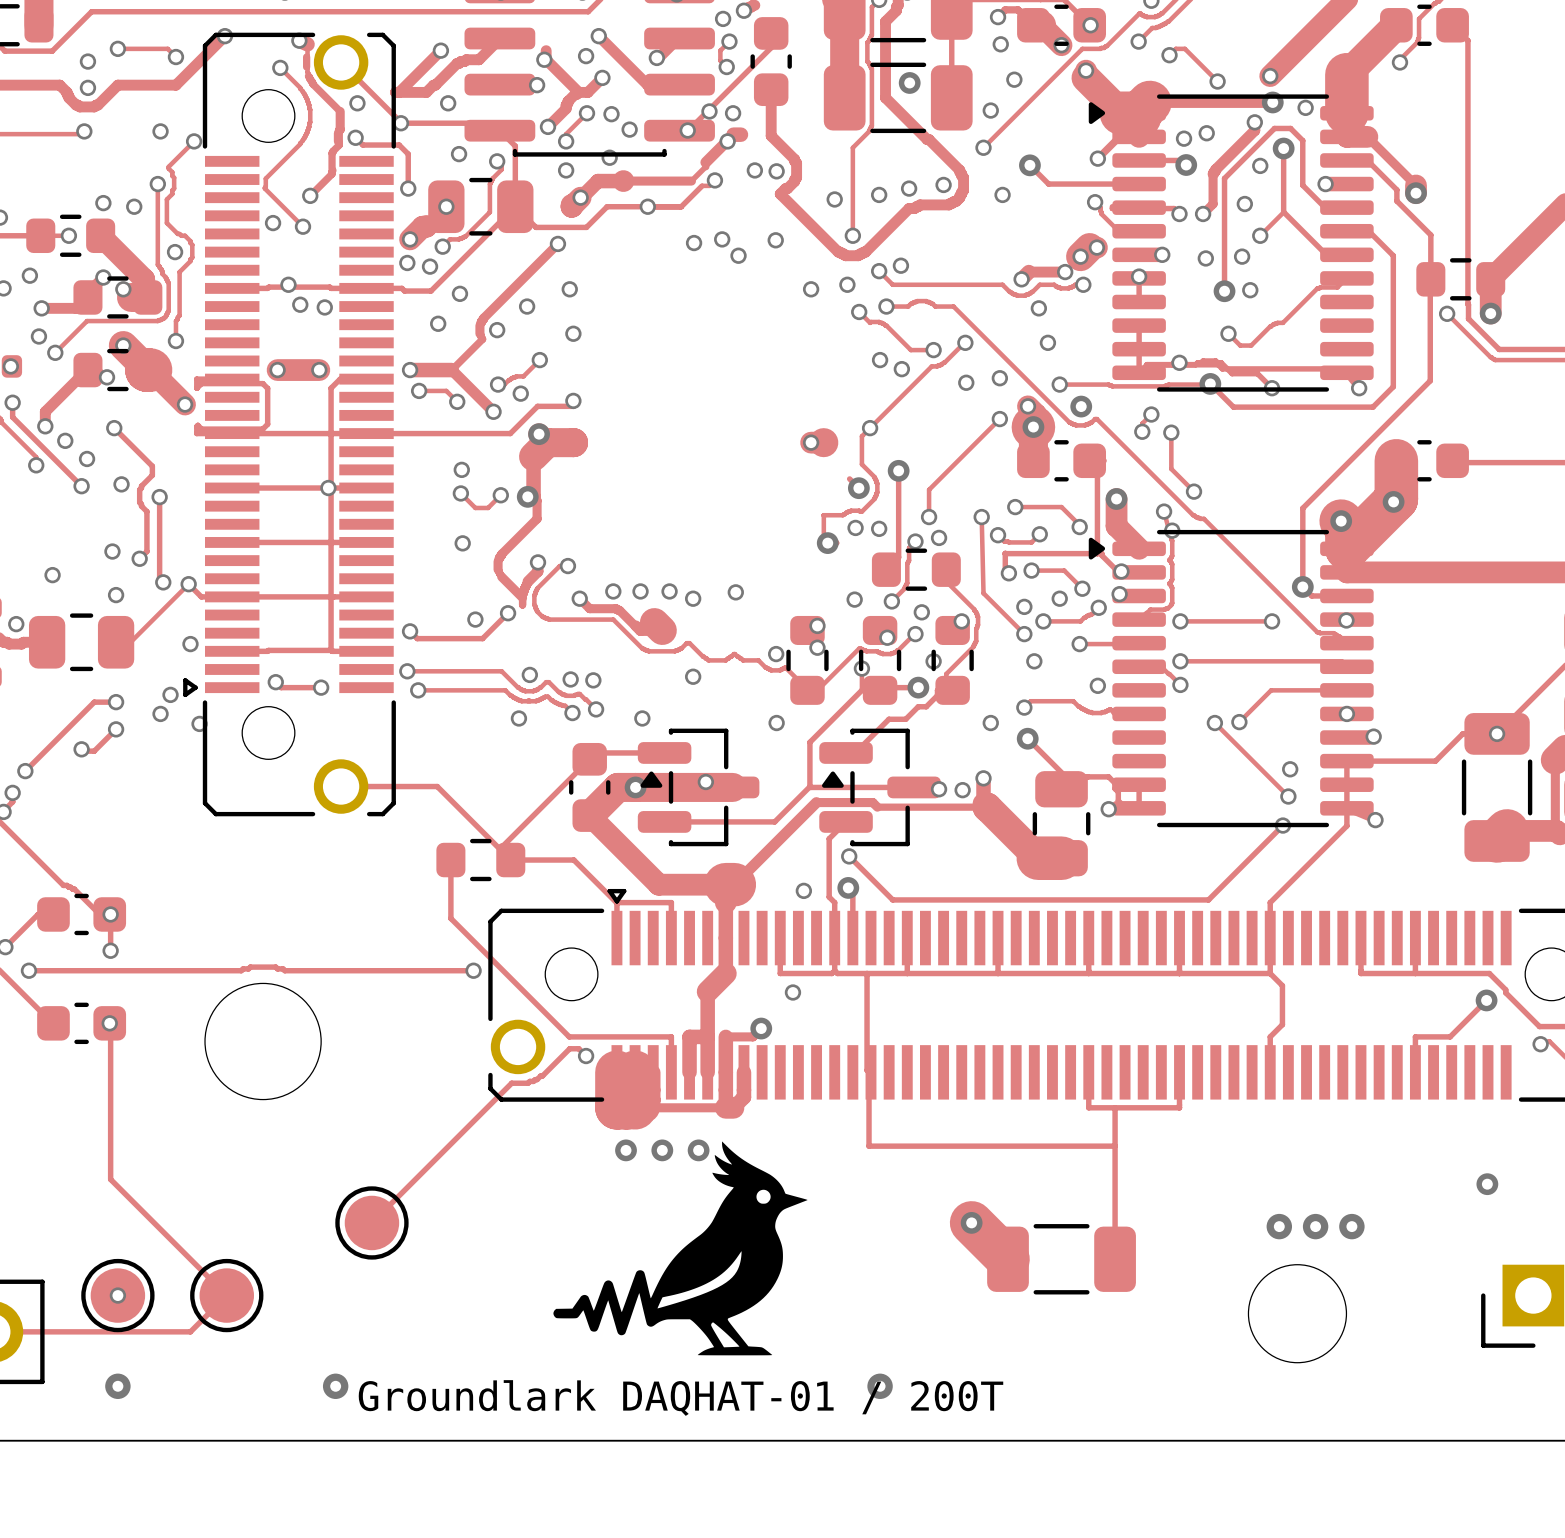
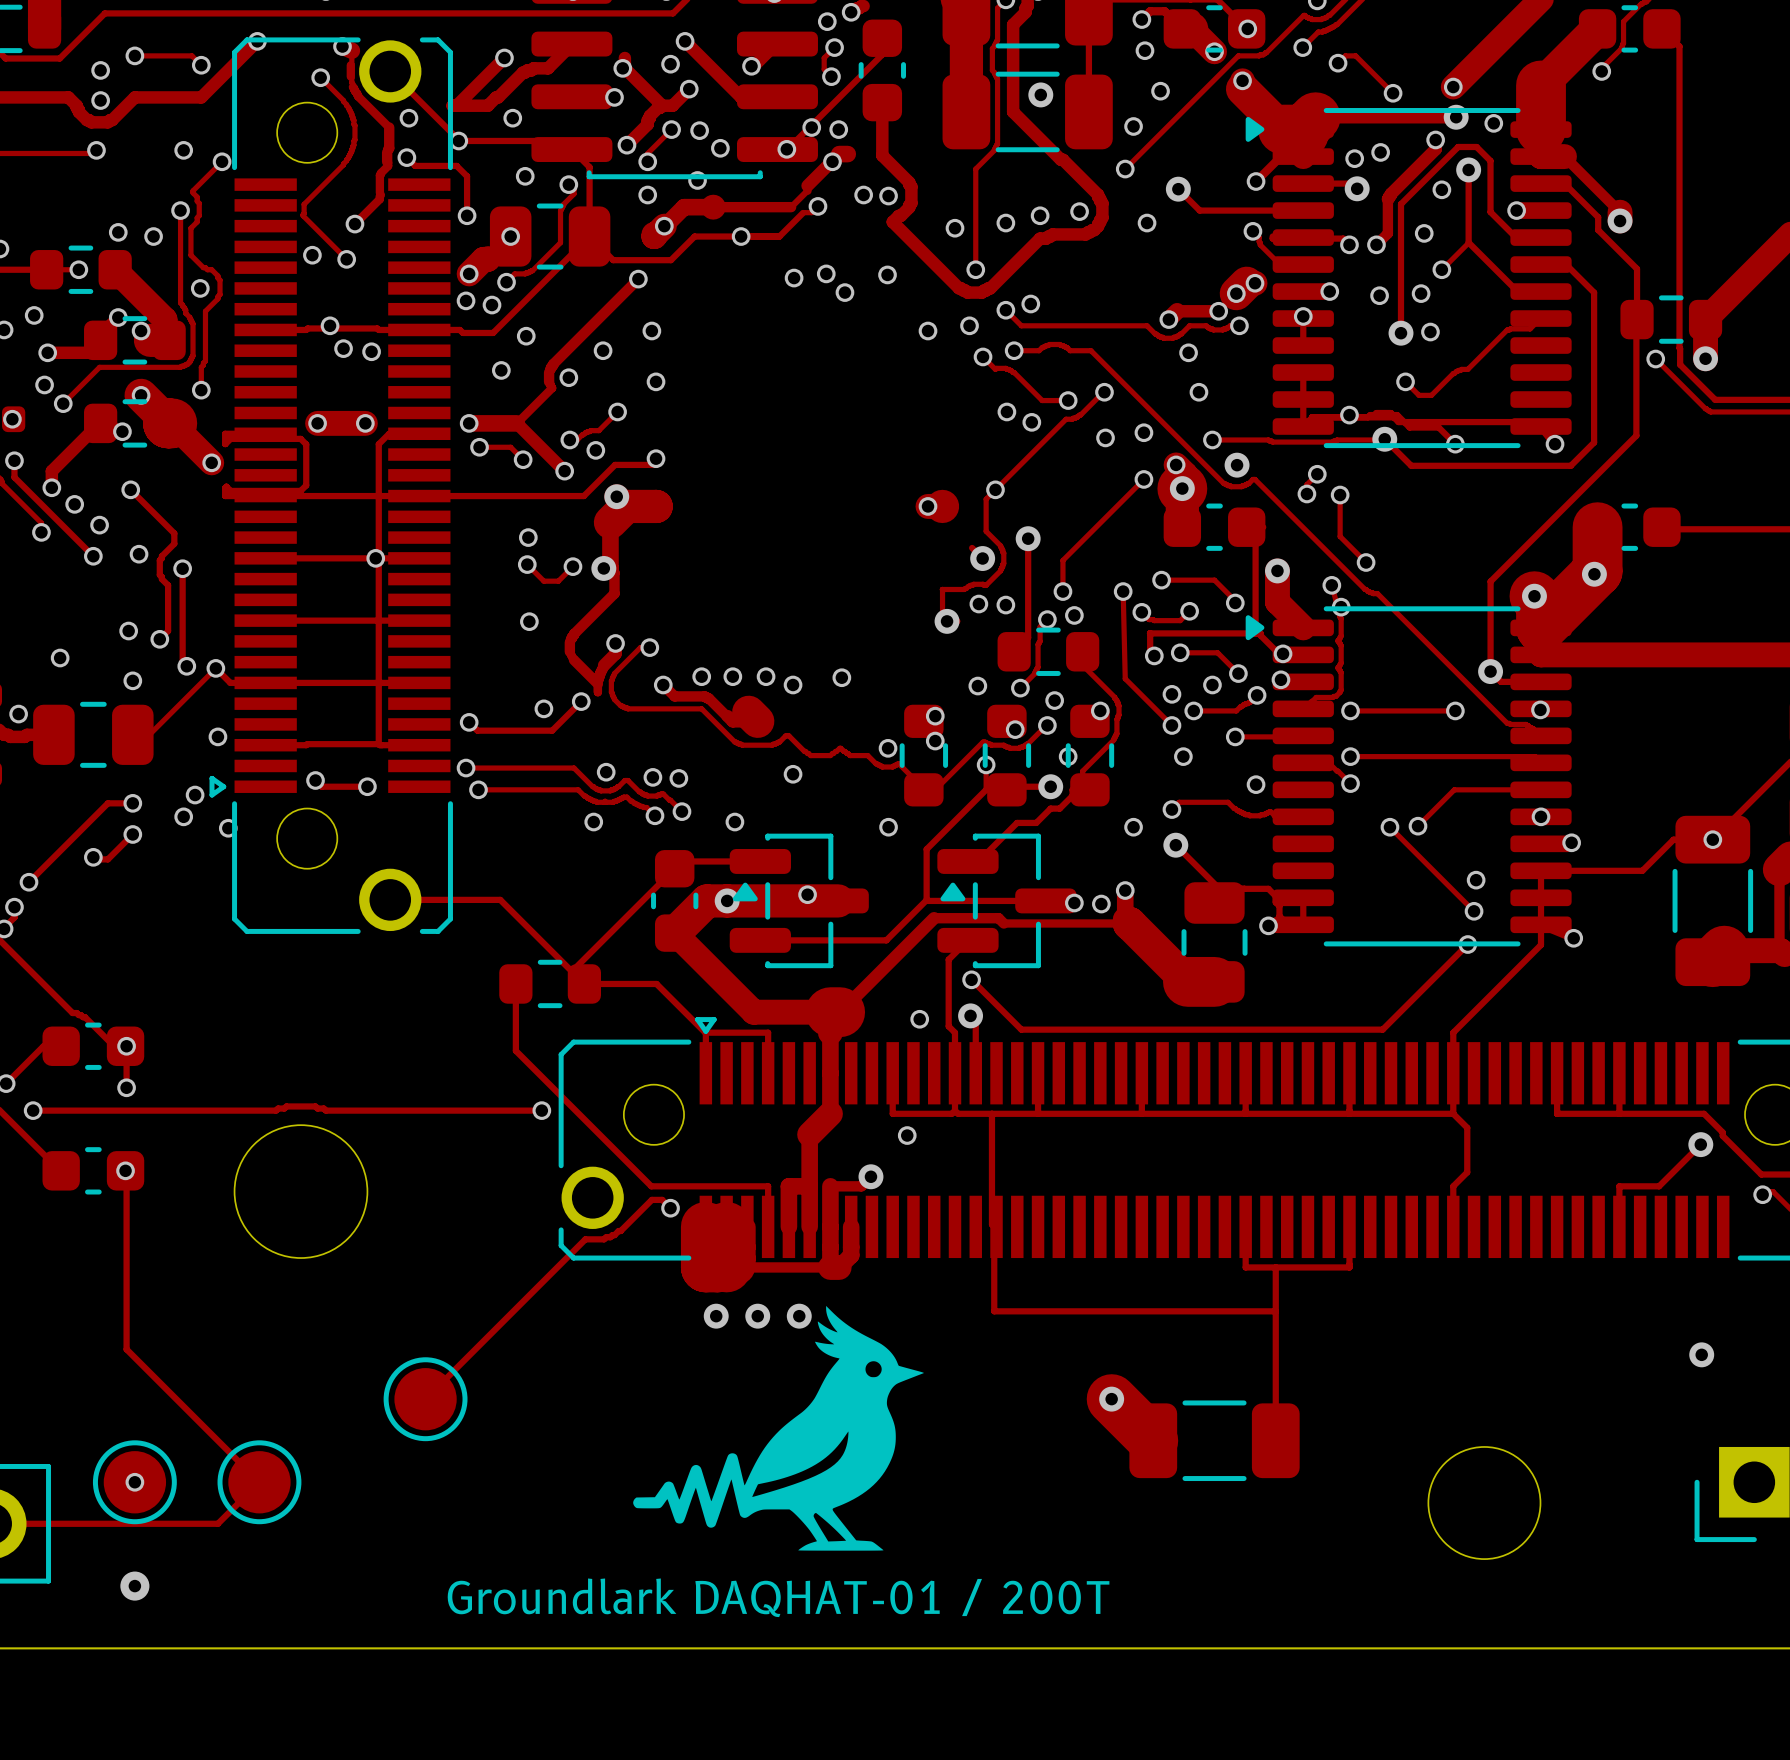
via: (1279, 1226) -> none
via: (1315, 1226) -> none
via: (1351, 1226) -> none
via: (335, 1386) -> none
via: (880, 1386) -> none

